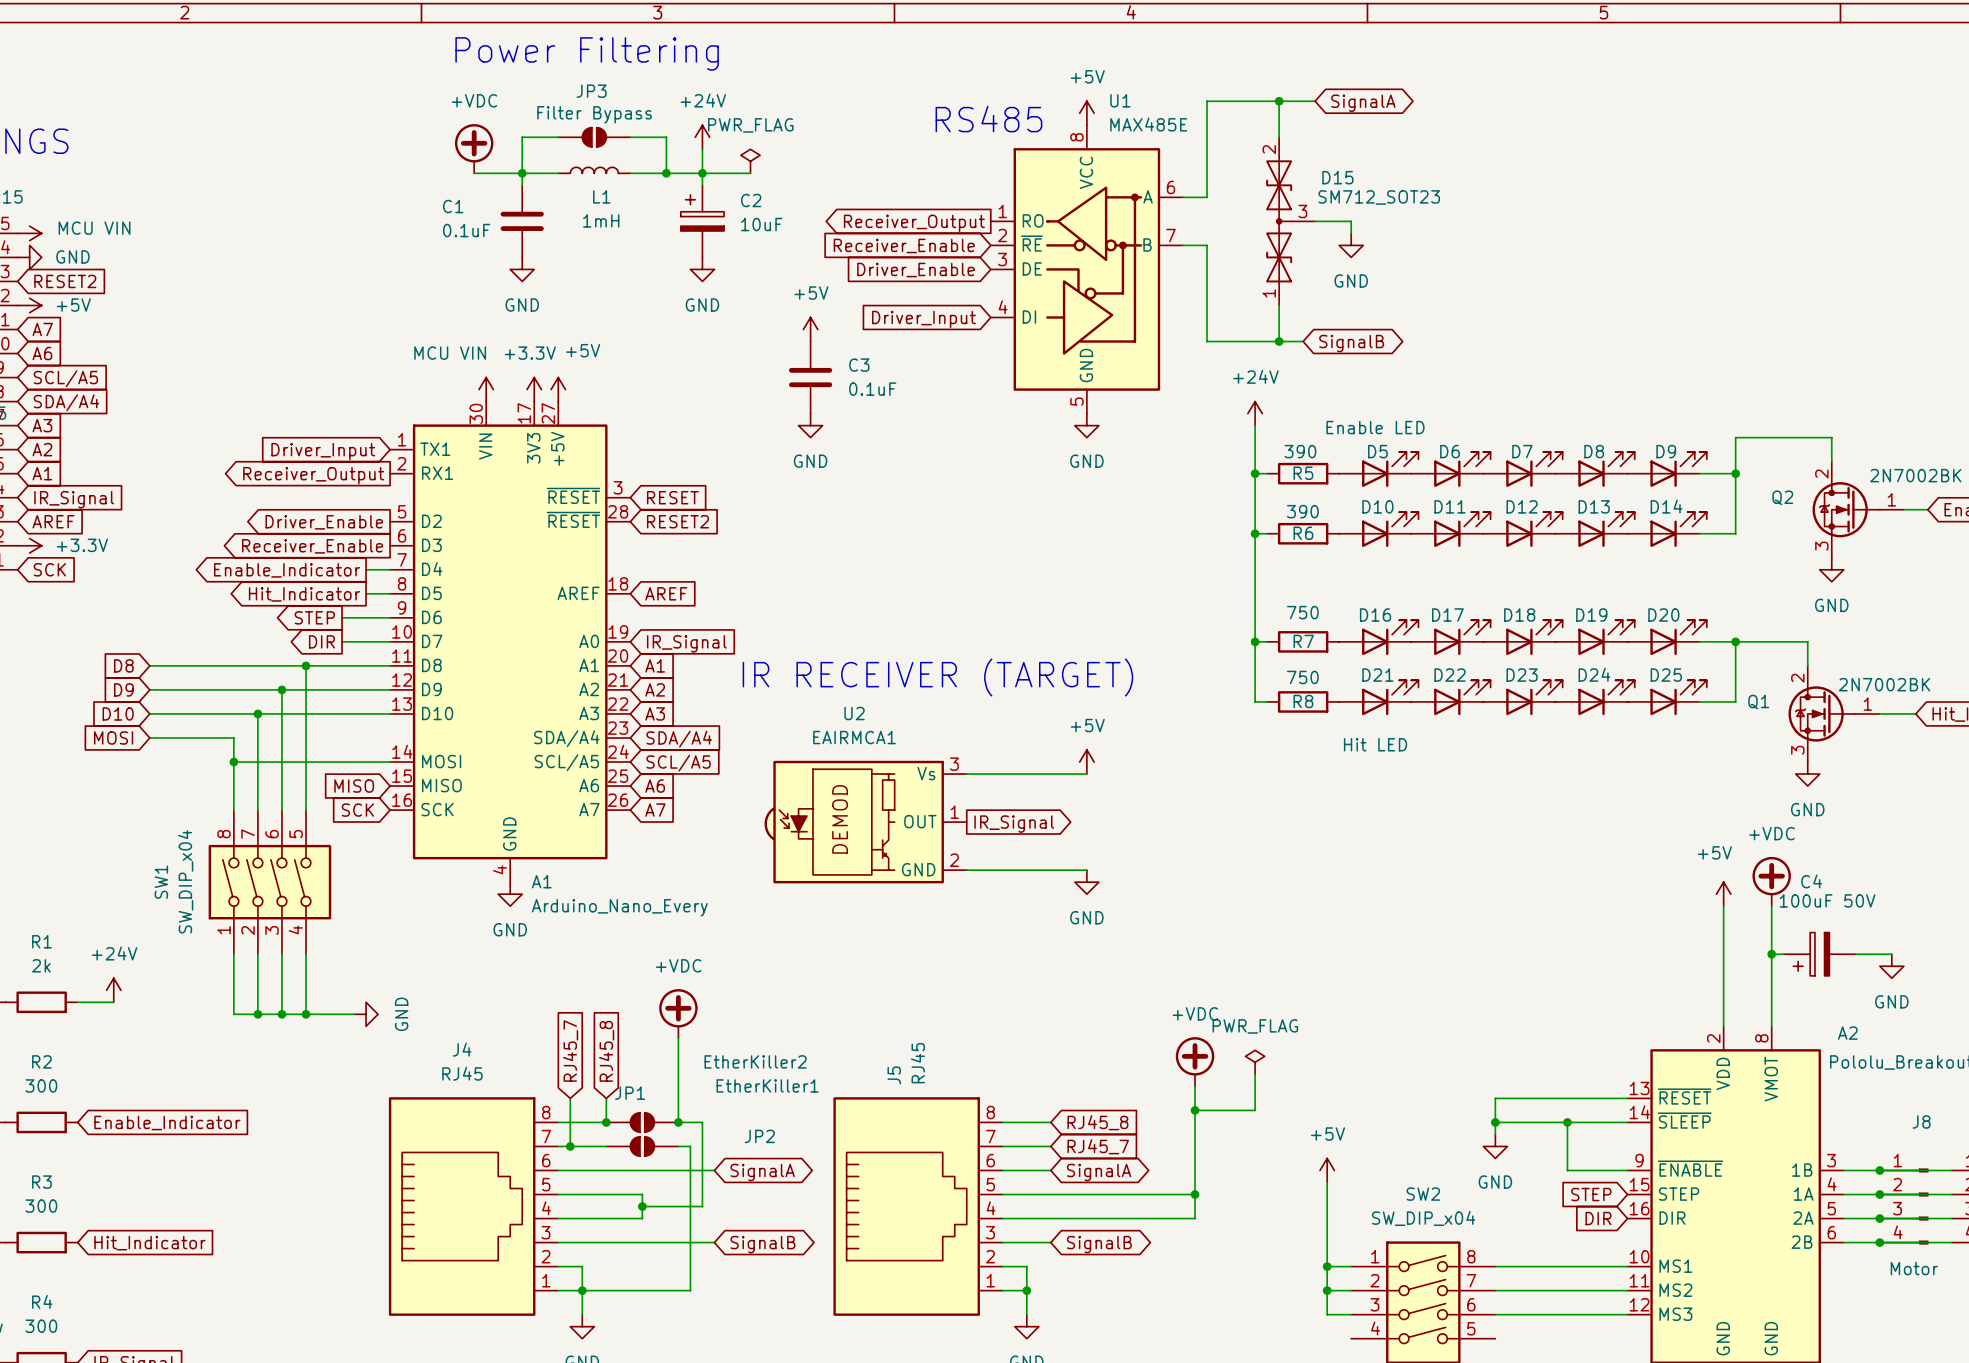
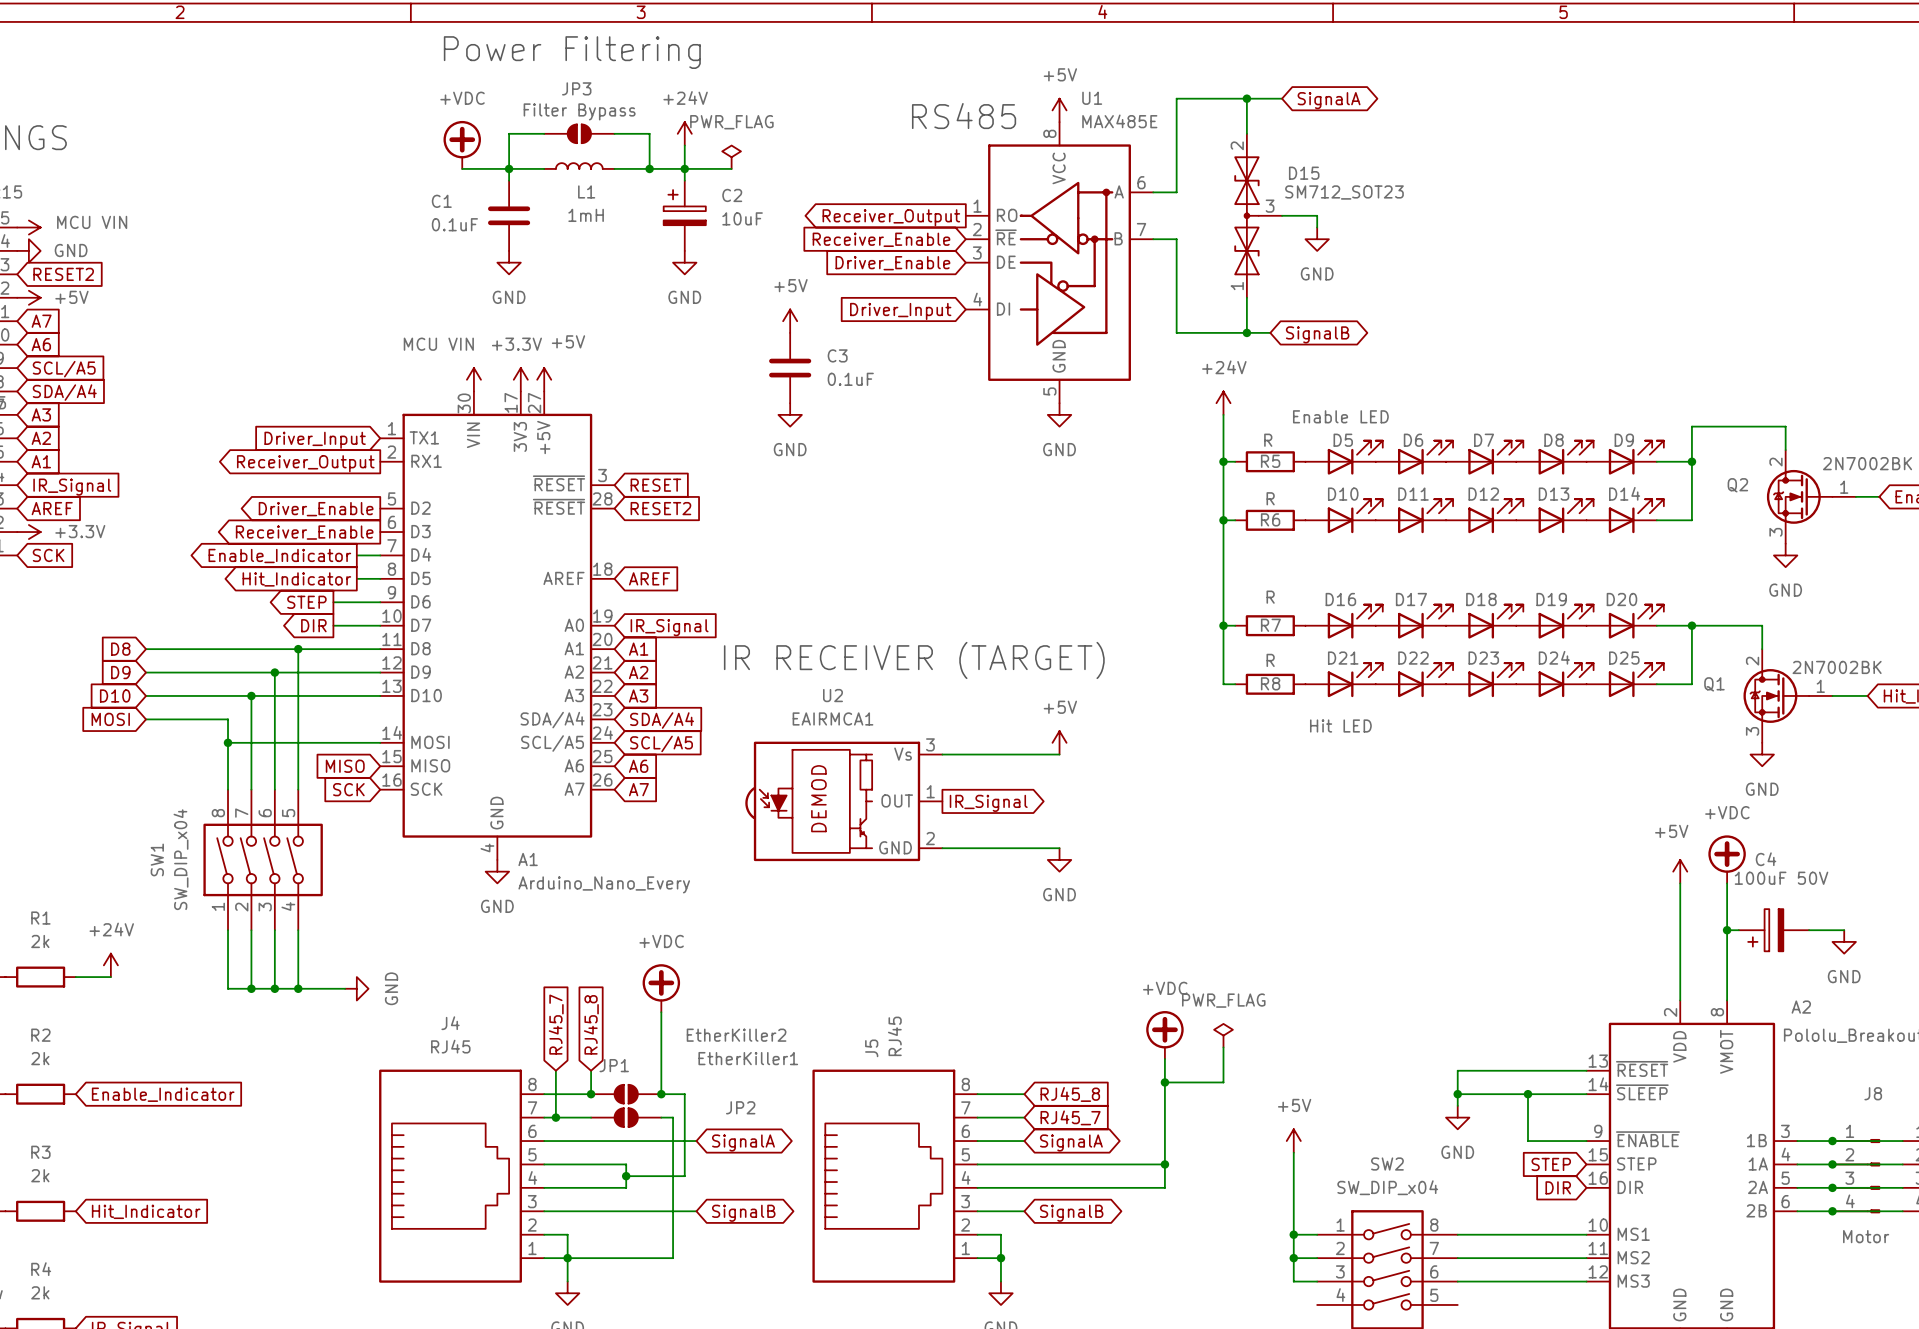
R5 value: 390 (1300, 451) -> R (1268, 440)
R6 value: 390 (1302, 511) -> R (1270, 498)
R7 value: 750 (1302, 612) -> R (1270, 597)
R8 value: 750 (1302, 677) -> R (1270, 660)
R2 value: 300 (41, 1085) -> 2k (40, 1058)
R3 value: 300 (41, 1206) -> 2k (40, 1175)
R4 value: 300 (41, 1326) -> 2k (40, 1292)

